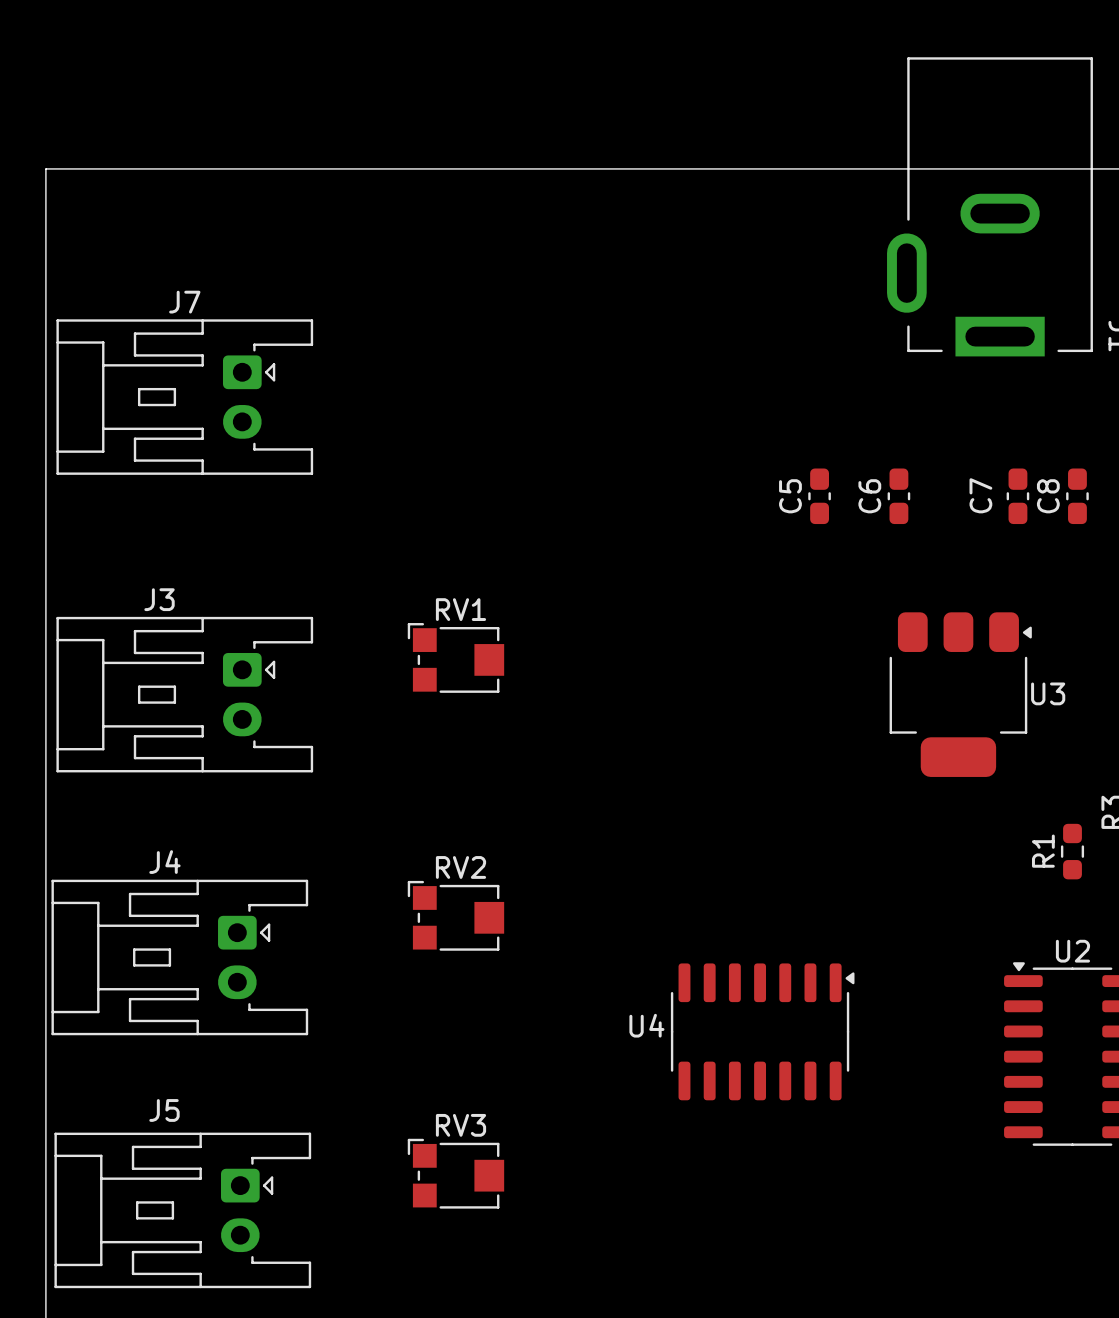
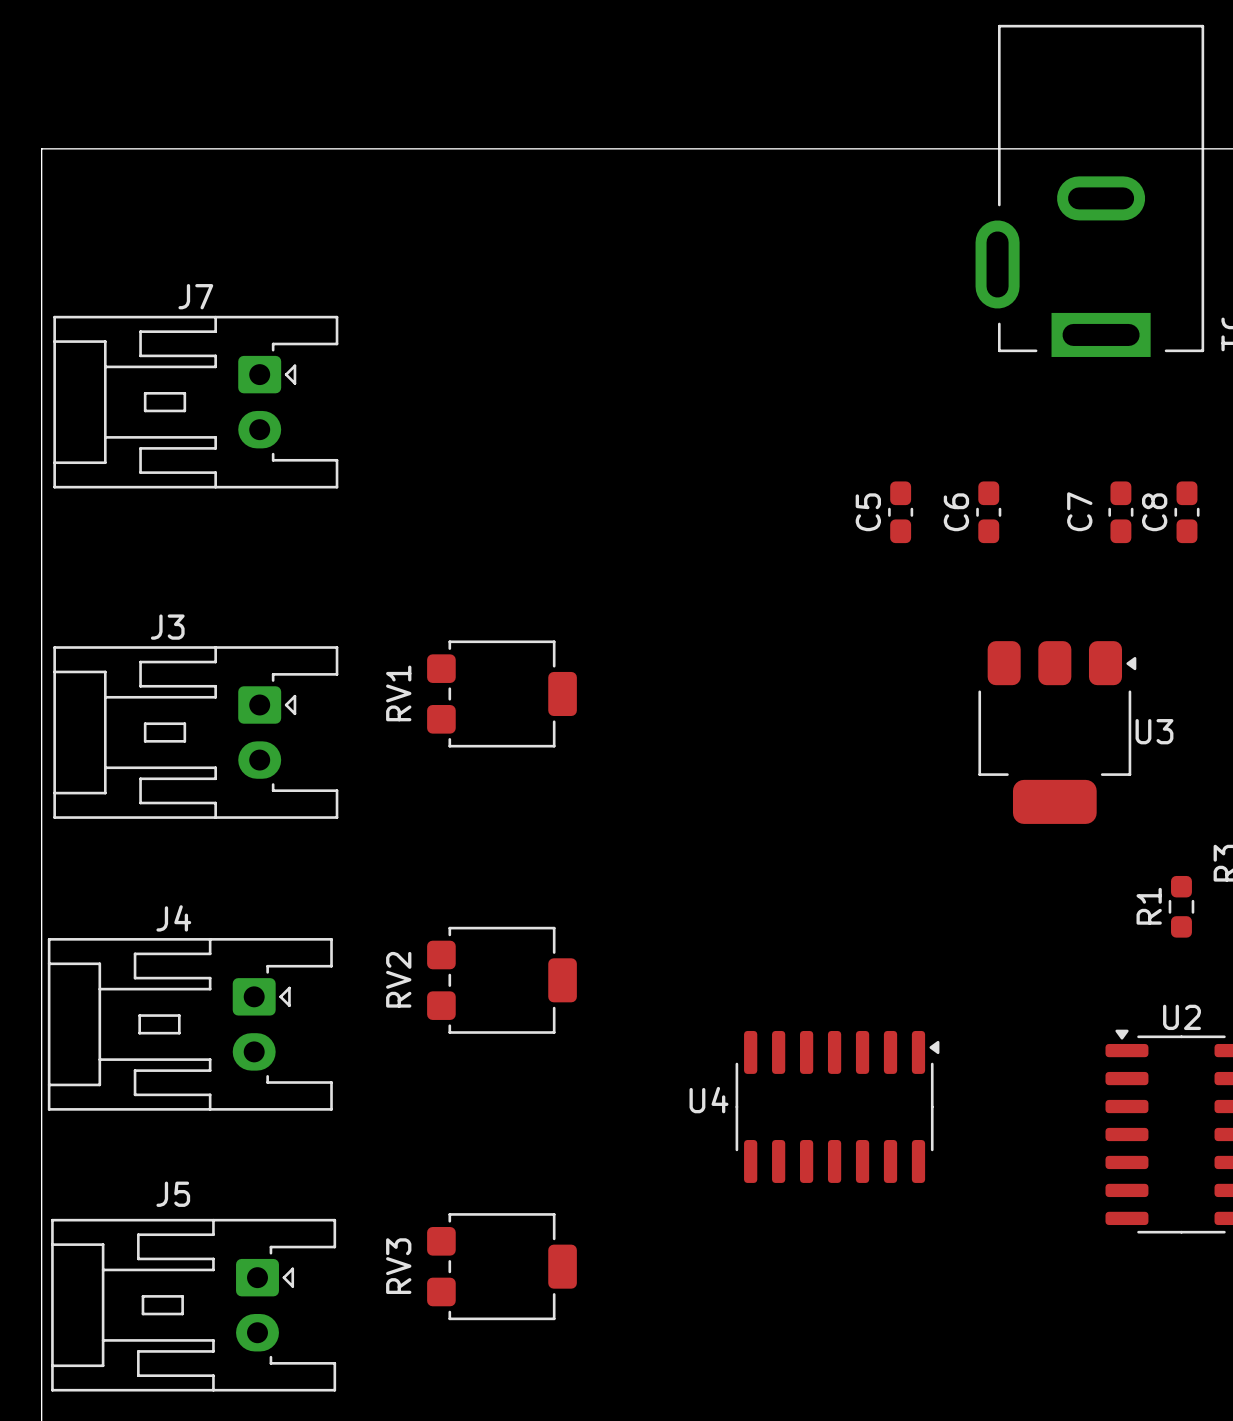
RV1 name position: RV1 (461, 609) -> RV1 (398, 693)
RV1 footprint: [407, 623, 505, 693] -> [427, 640, 577, 748]
RV2 name position: RV2 (461, 867) -> RV2 (398, 979)
RV2 footprint: [407, 880, 505, 951] -> [427, 926, 577, 1034]
RV3 name position: RV3 (461, 1125) -> RV3 (398, 1266)
RV3 footprint: [407, 1138, 505, 1209] -> [427, 1213, 577, 1321]

